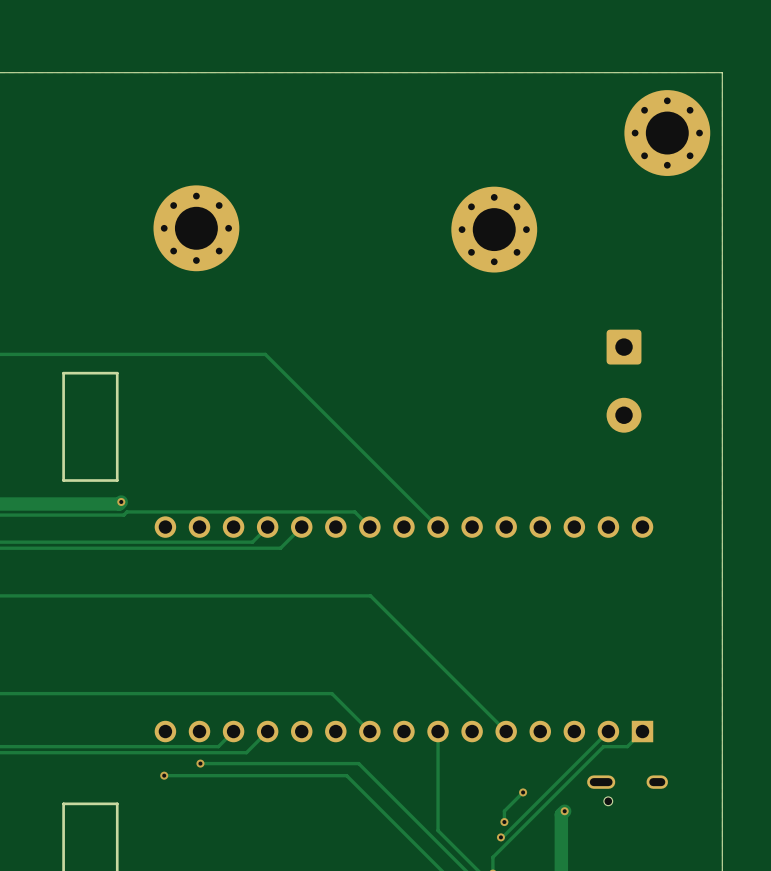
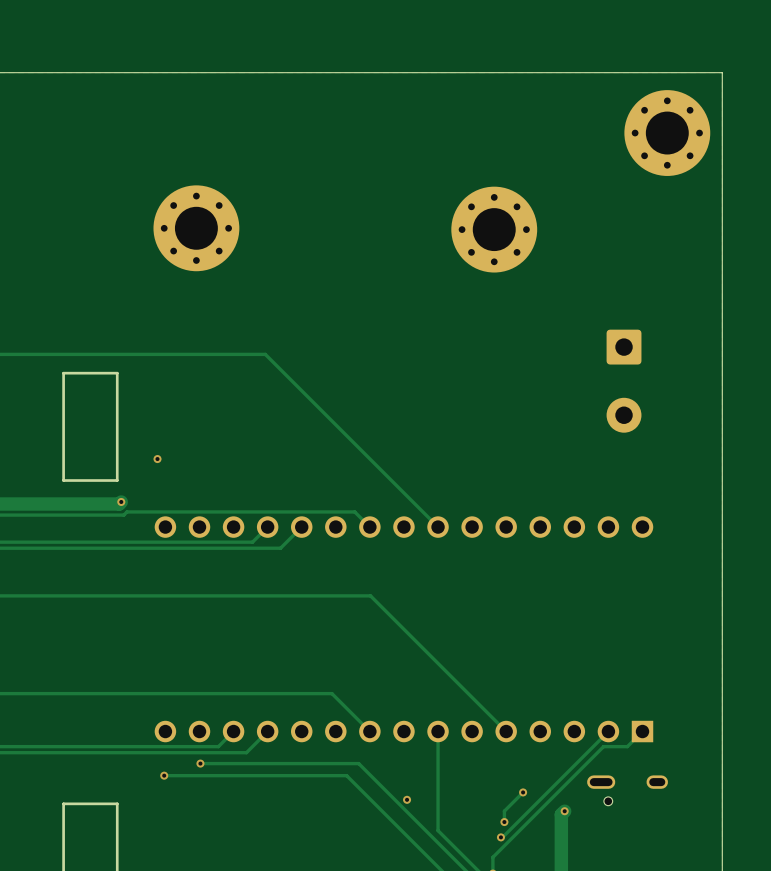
via: none -> (157, 459)
via: none -> (407, 799)

